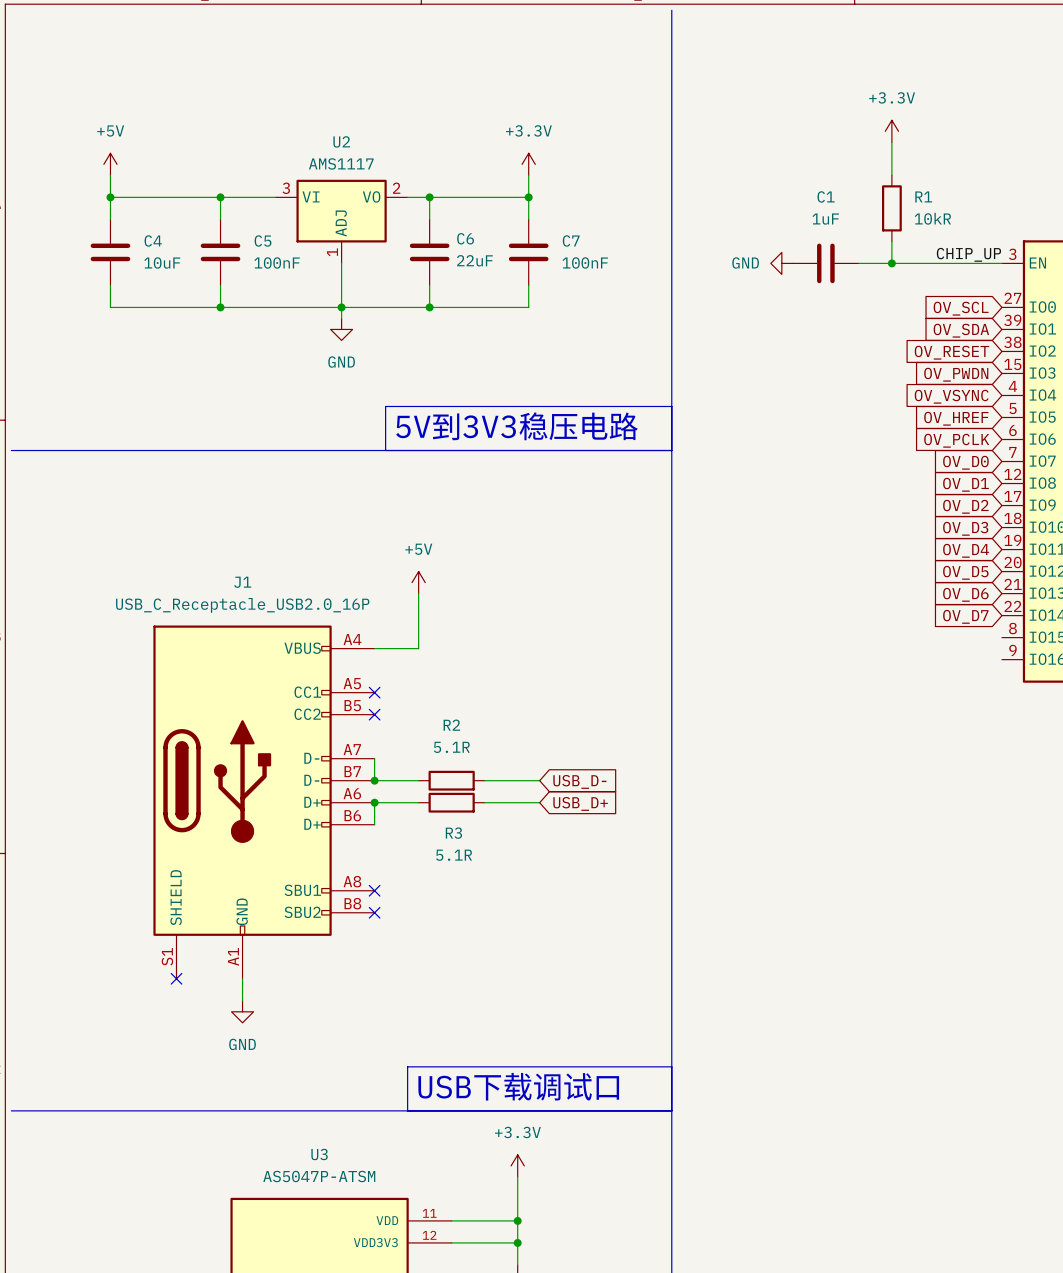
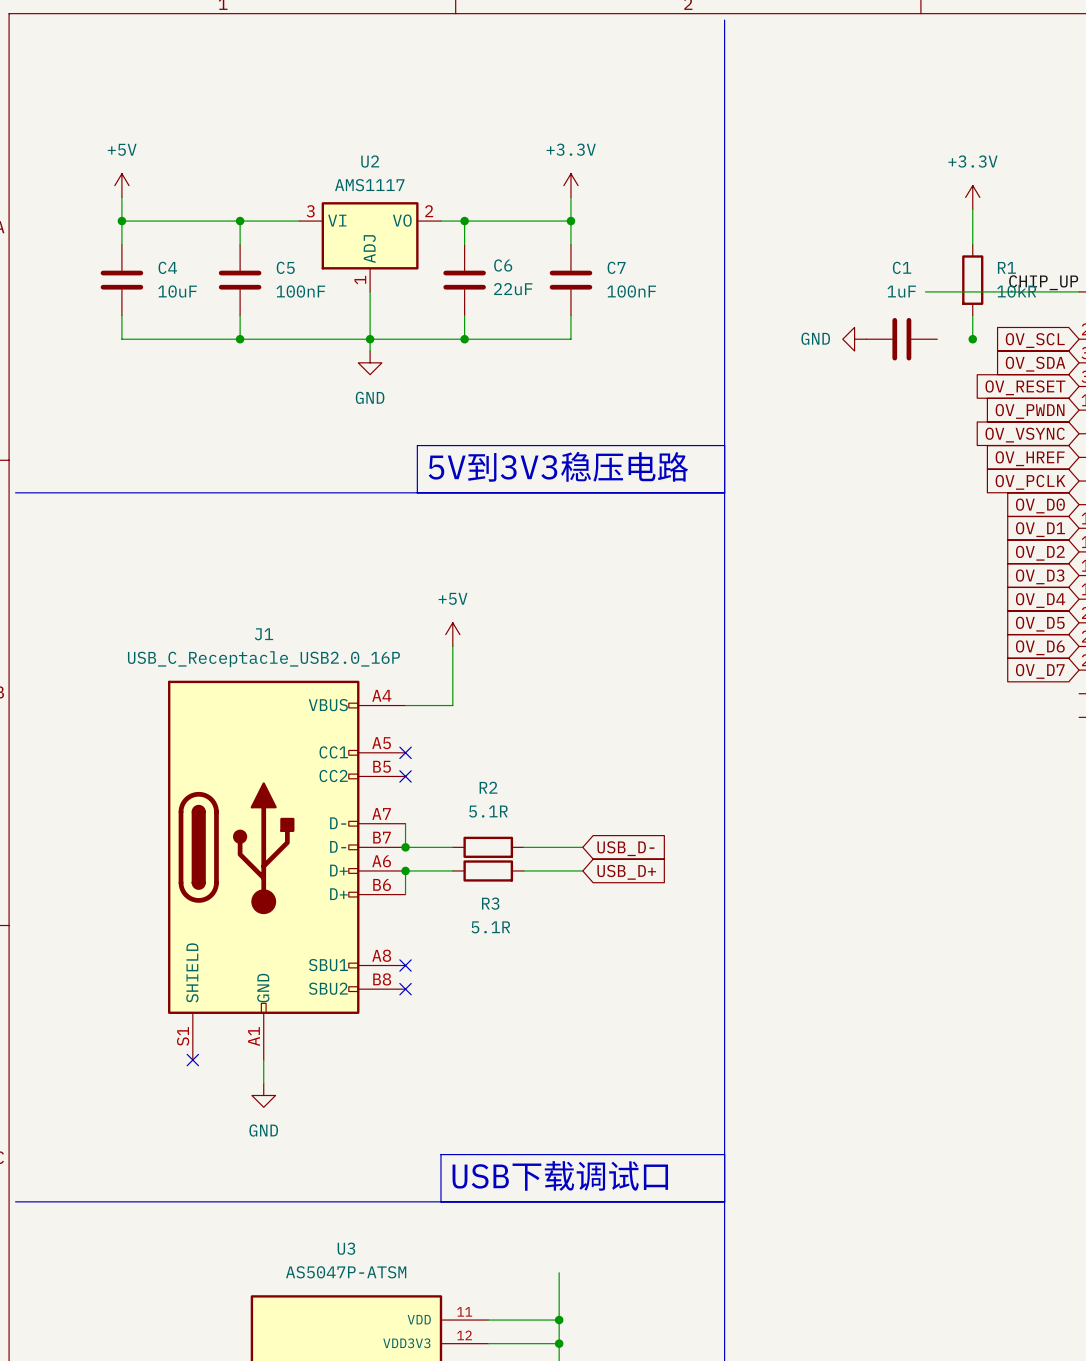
power symbol position: +3.3V (891, 131) -> +3.3V (972, 197)
wire: (891, 142) (891, 175) -> (972, 209) (972, 244)
R1 position: (891, 208) -> (972, 280)
wire: (891, 241) (891, 263) -> (972, 315) (972, 339)
power symbol position: GND (781, 263) -> GND (854, 339)
C1 position: (825, 263) -> (901, 339)
junction position: (891, 263) -> (972, 339)
power symbol: +3.3V (517, 1165) -> none

